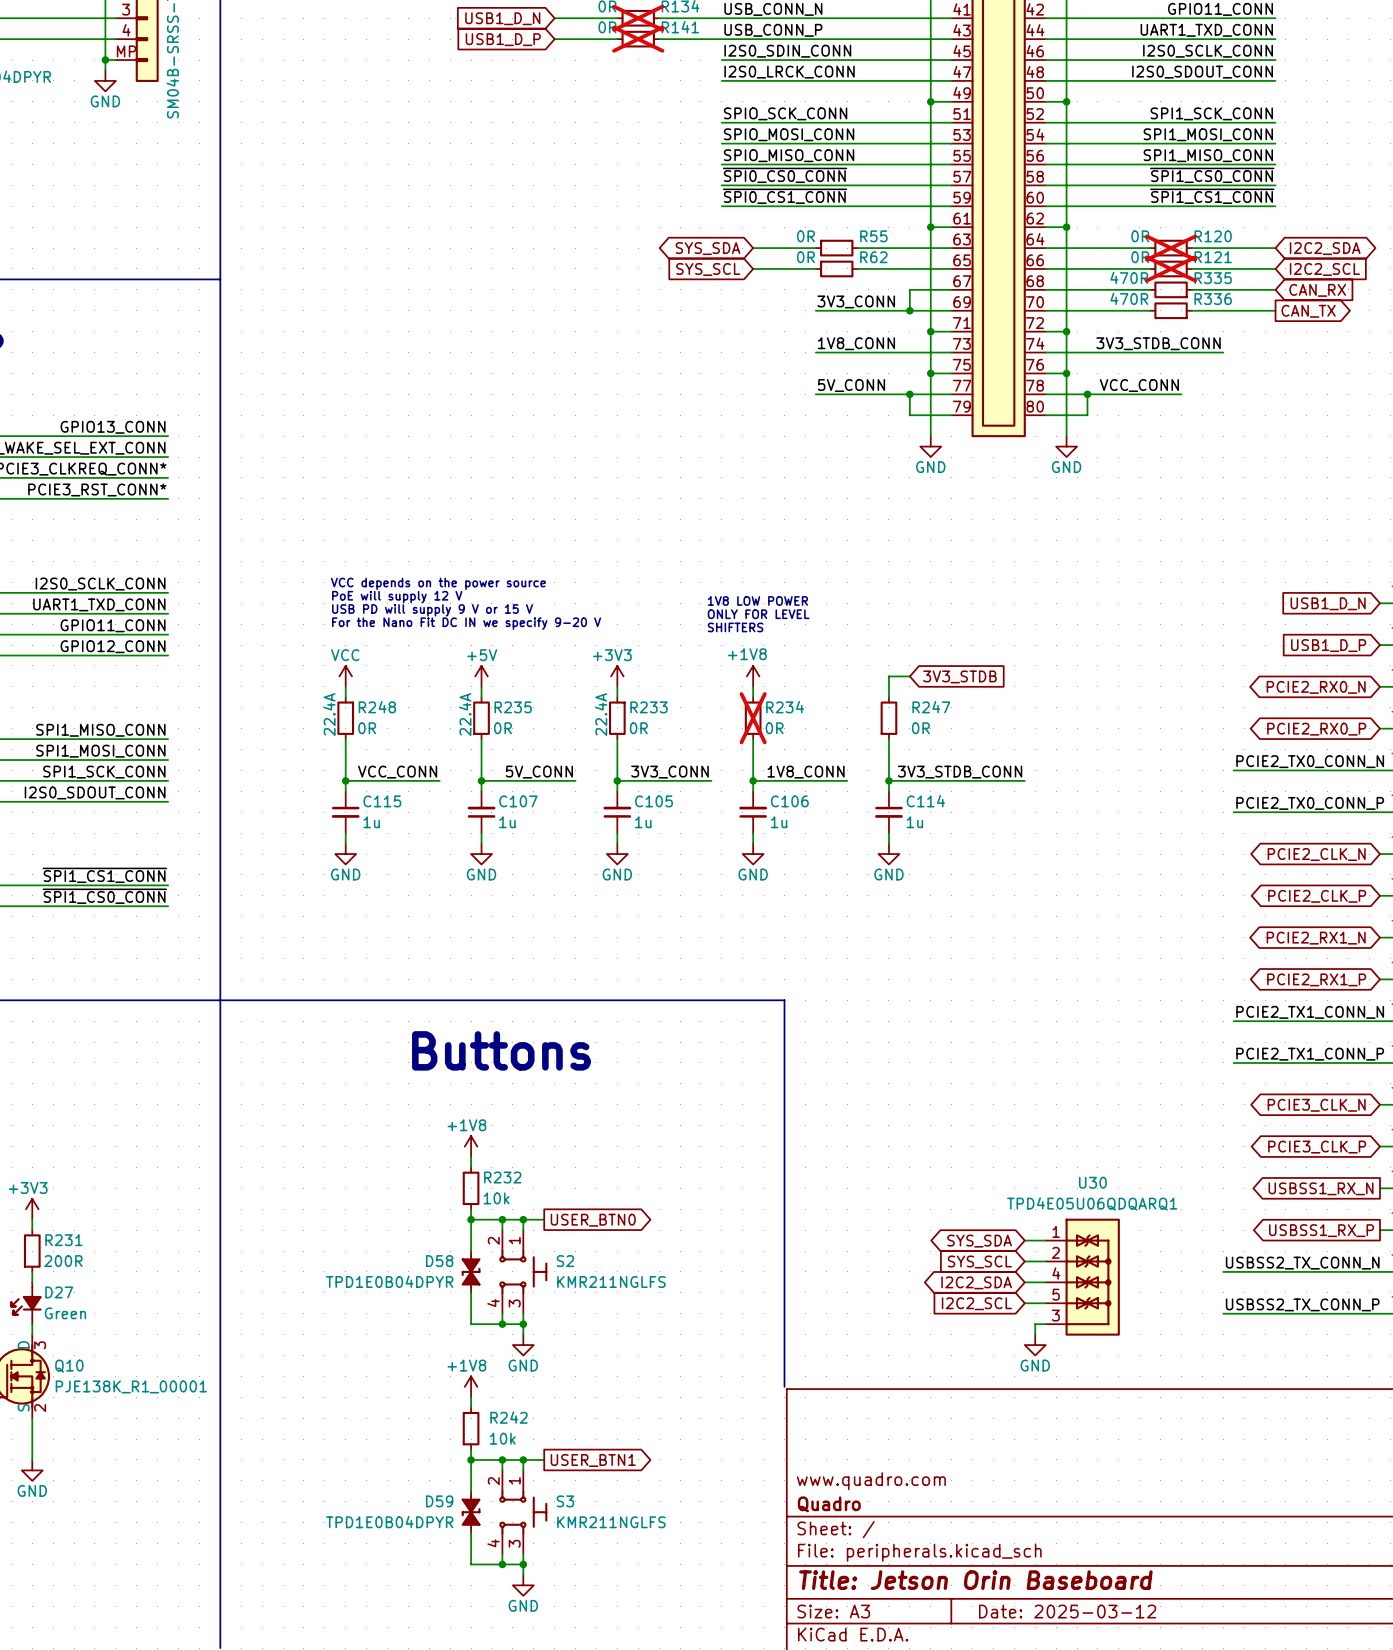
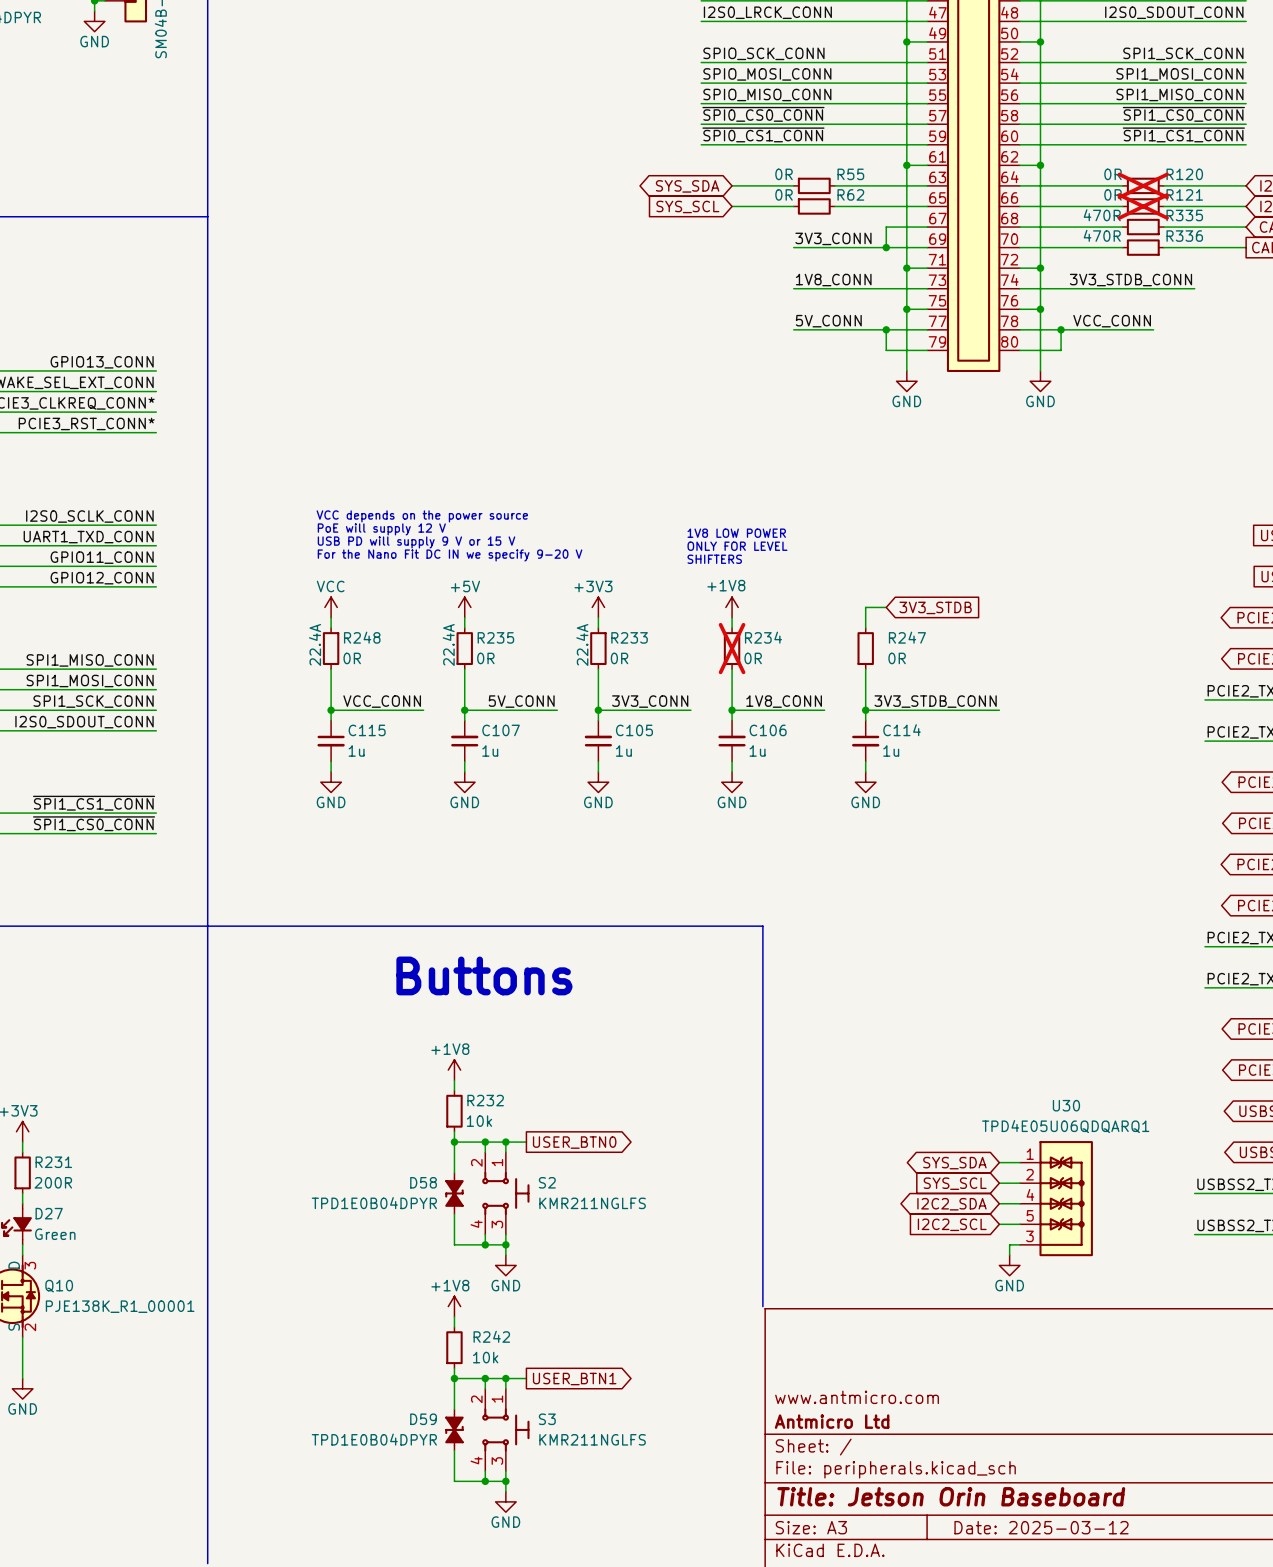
title block: www.quadro.com (871, 1481) -> www.antmicro.com (857, 1397)
title block: Quadro (829, 1504) -> Antmicro Ltd (832, 1421)

